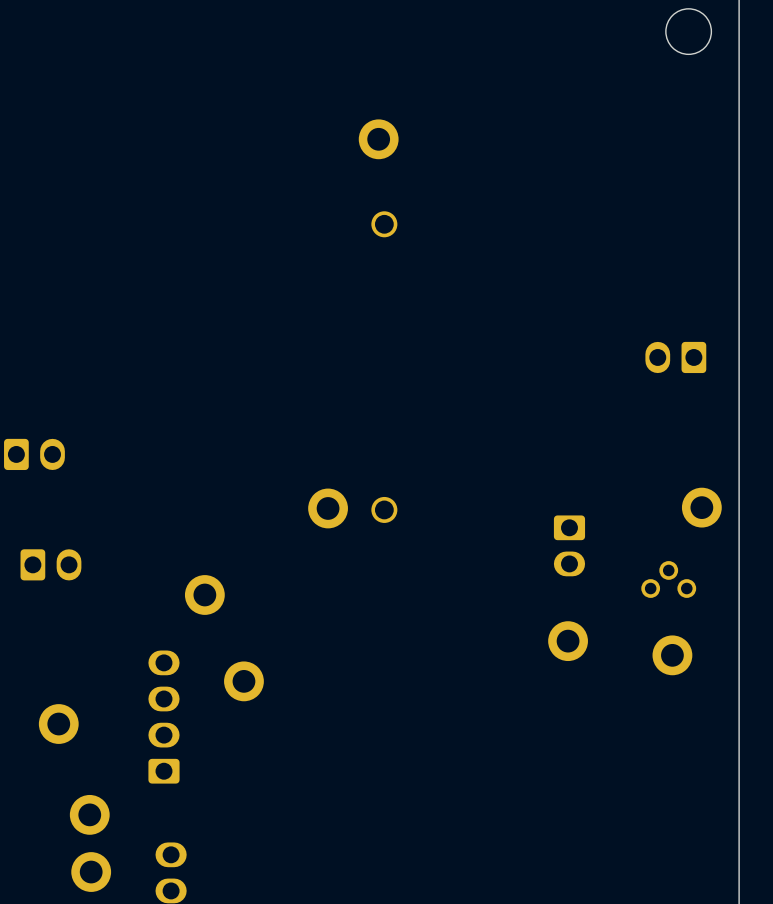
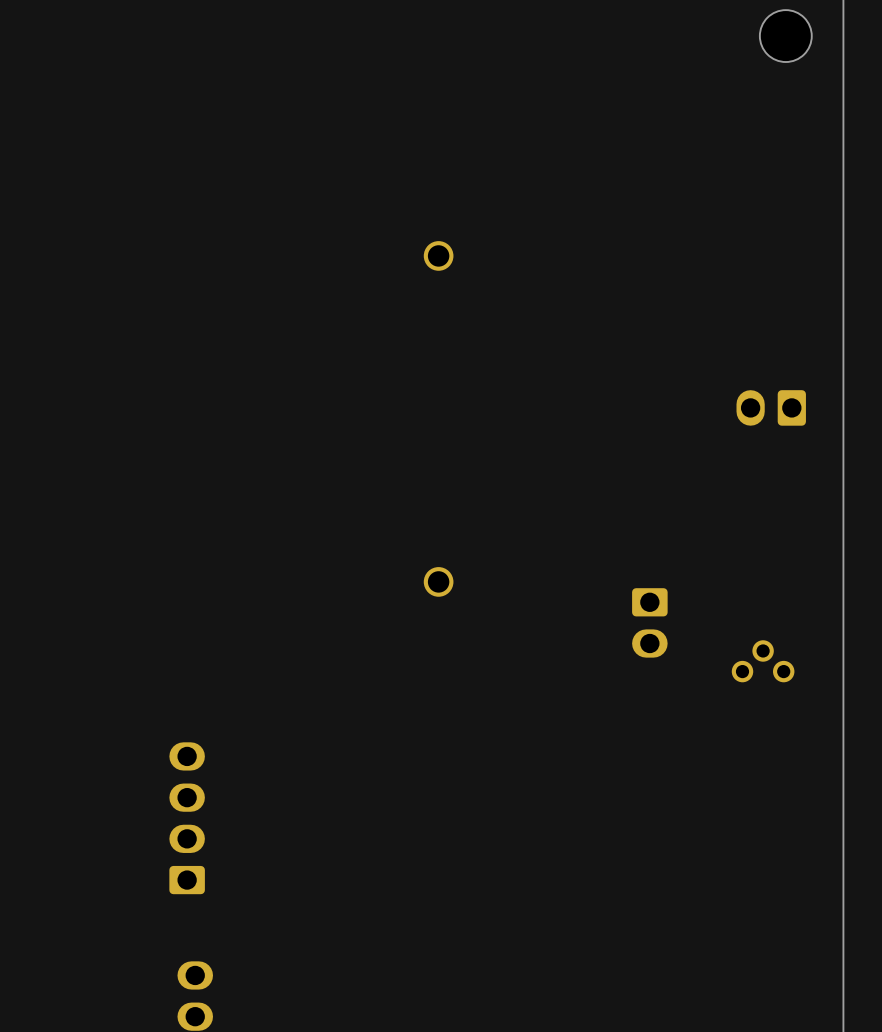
part: (378, 139) -> none
part: (34, 454) -> none
part: (701, 507) -> none
part: (328, 508) -> none
part: (50, 564) -> none
part: (204, 594) -> none
part: (568, 641) -> none
part: (672, 655) -> none
part: (243, 681) -> none
part: (58, 724) -> none
part: (89, 814) -> none
part: (91, 872) -> none

